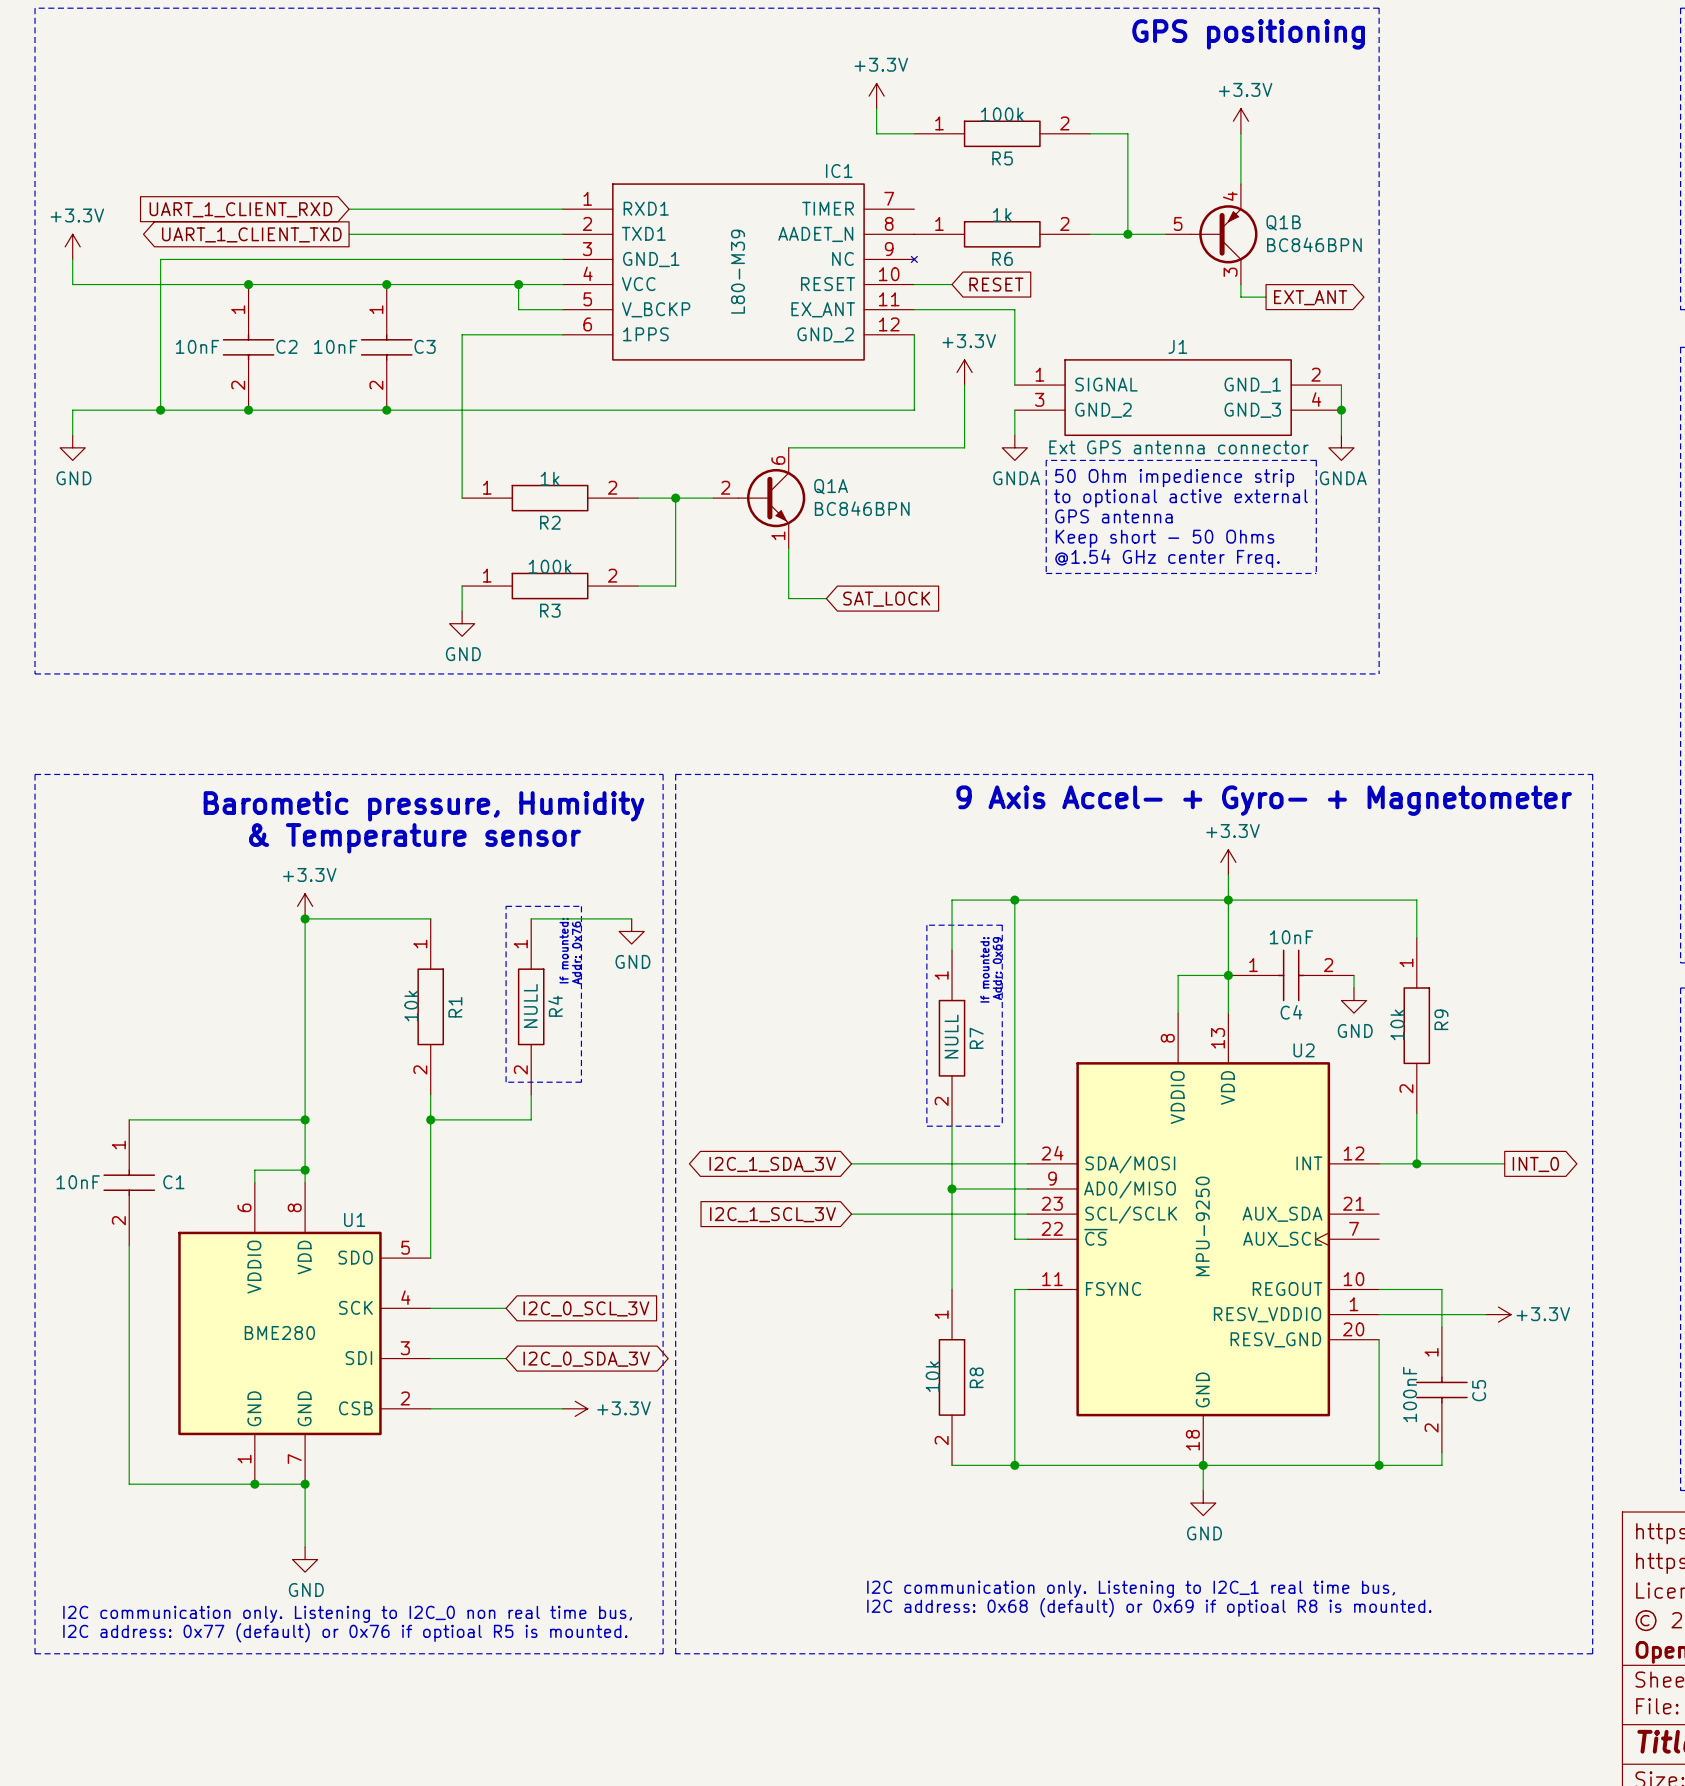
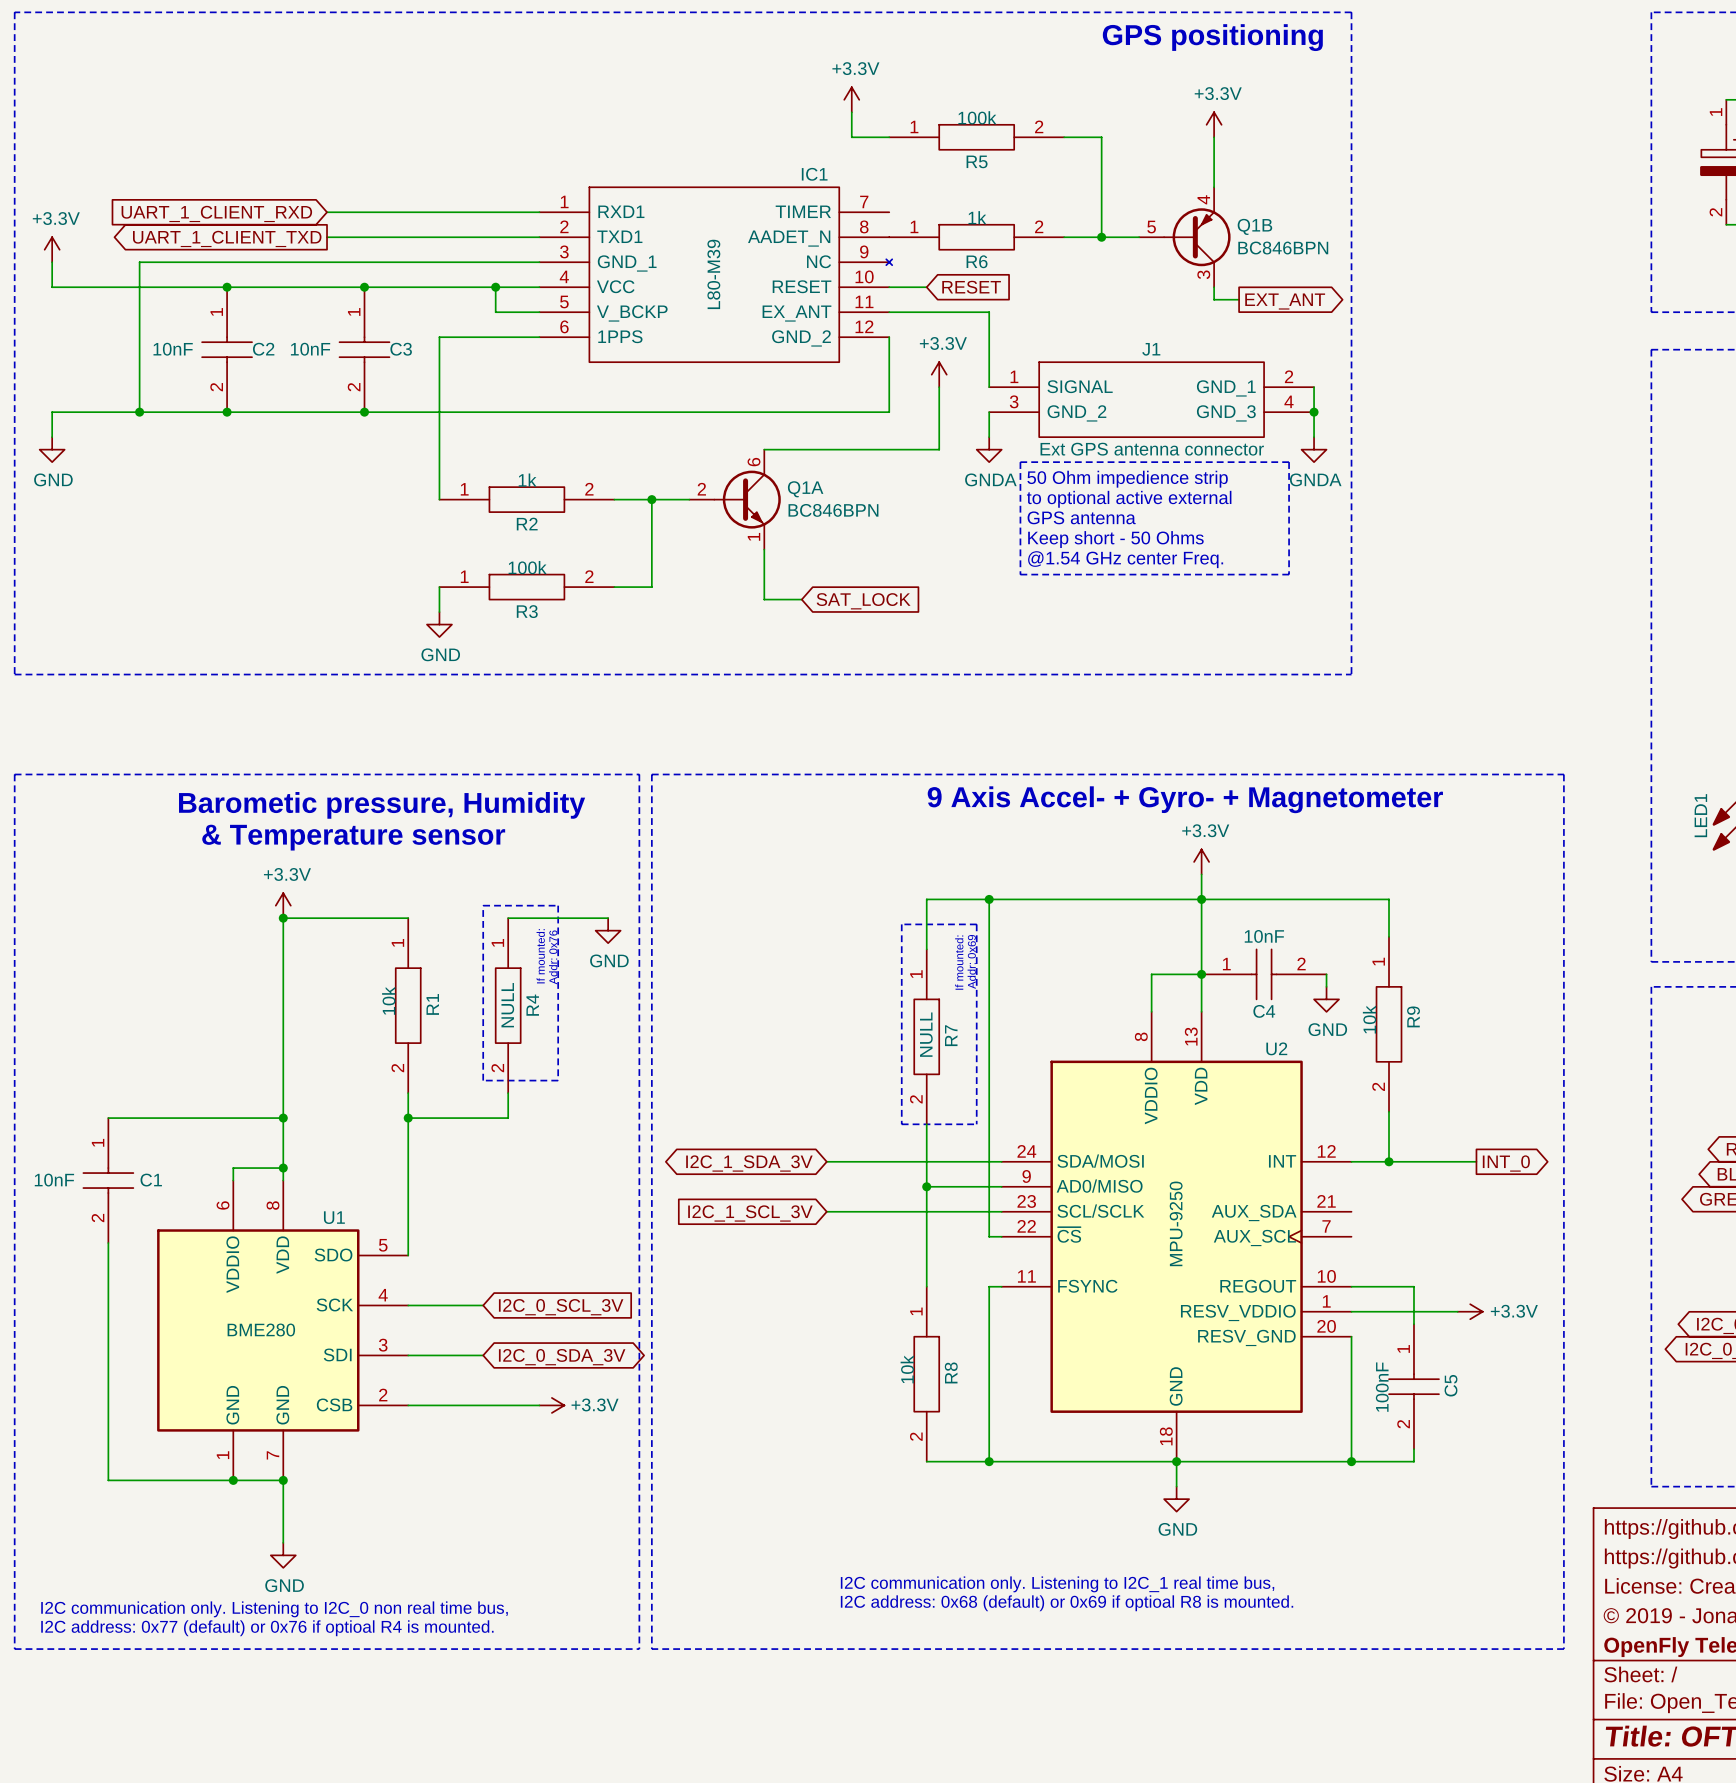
text: I2C address: 0x77 (default) or 0x76 if optioal R5 is mounted. (345, 1632) -> I2C address: 0x77 (default) or 0x76 if optioal R4 is mounted. (267, 1628)

